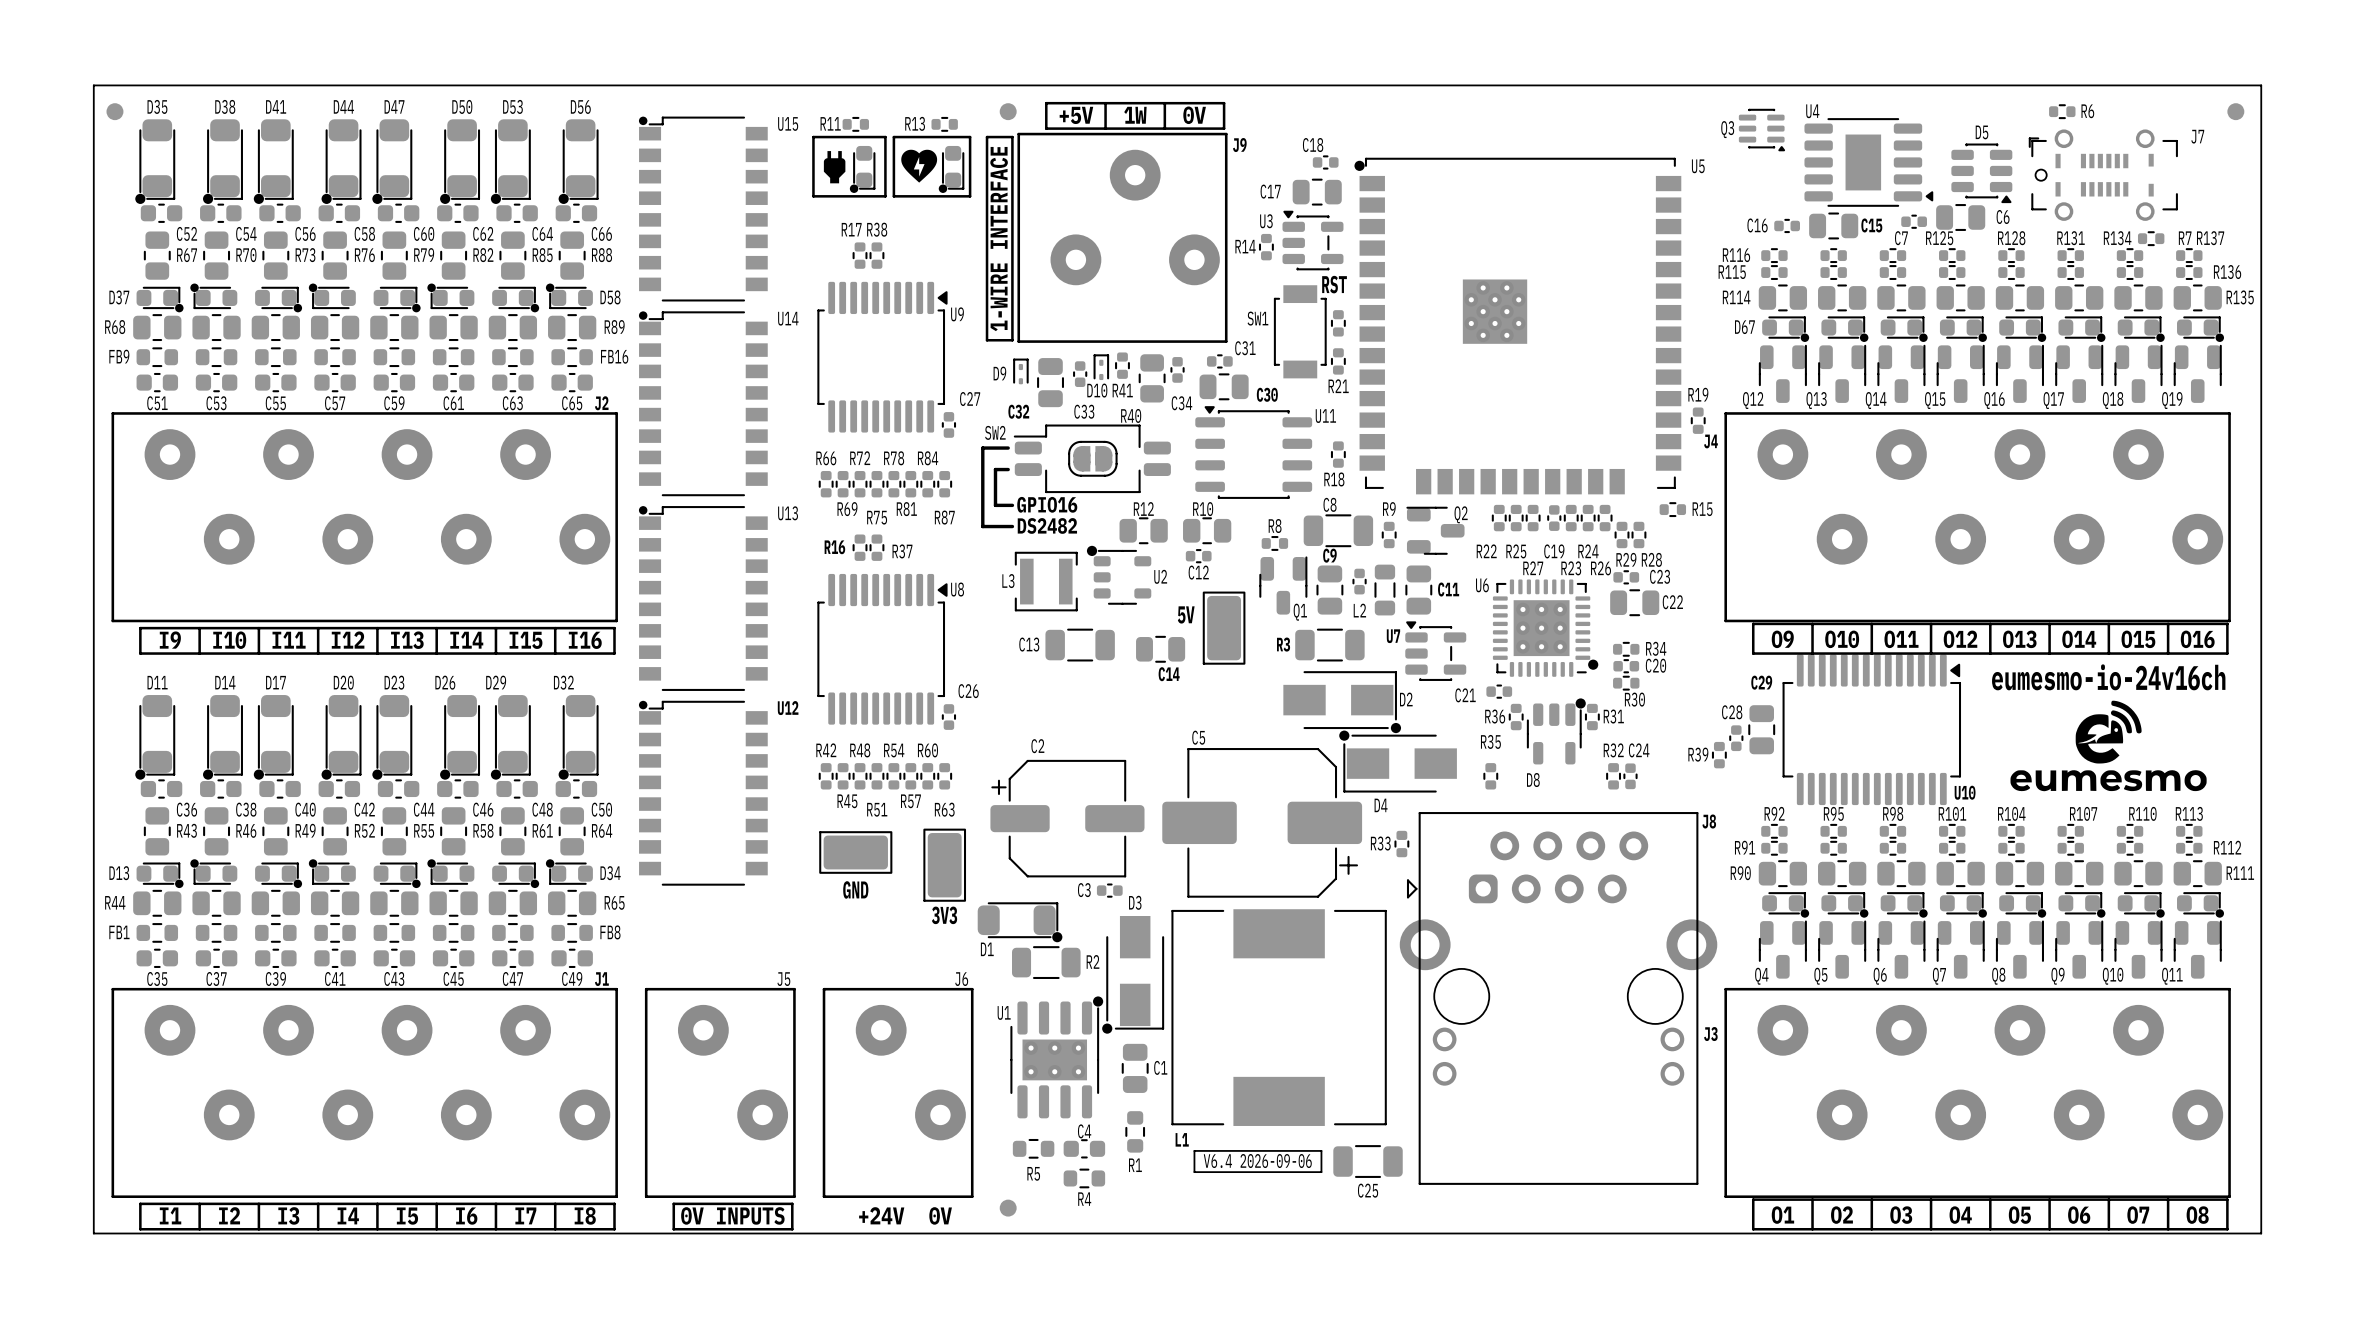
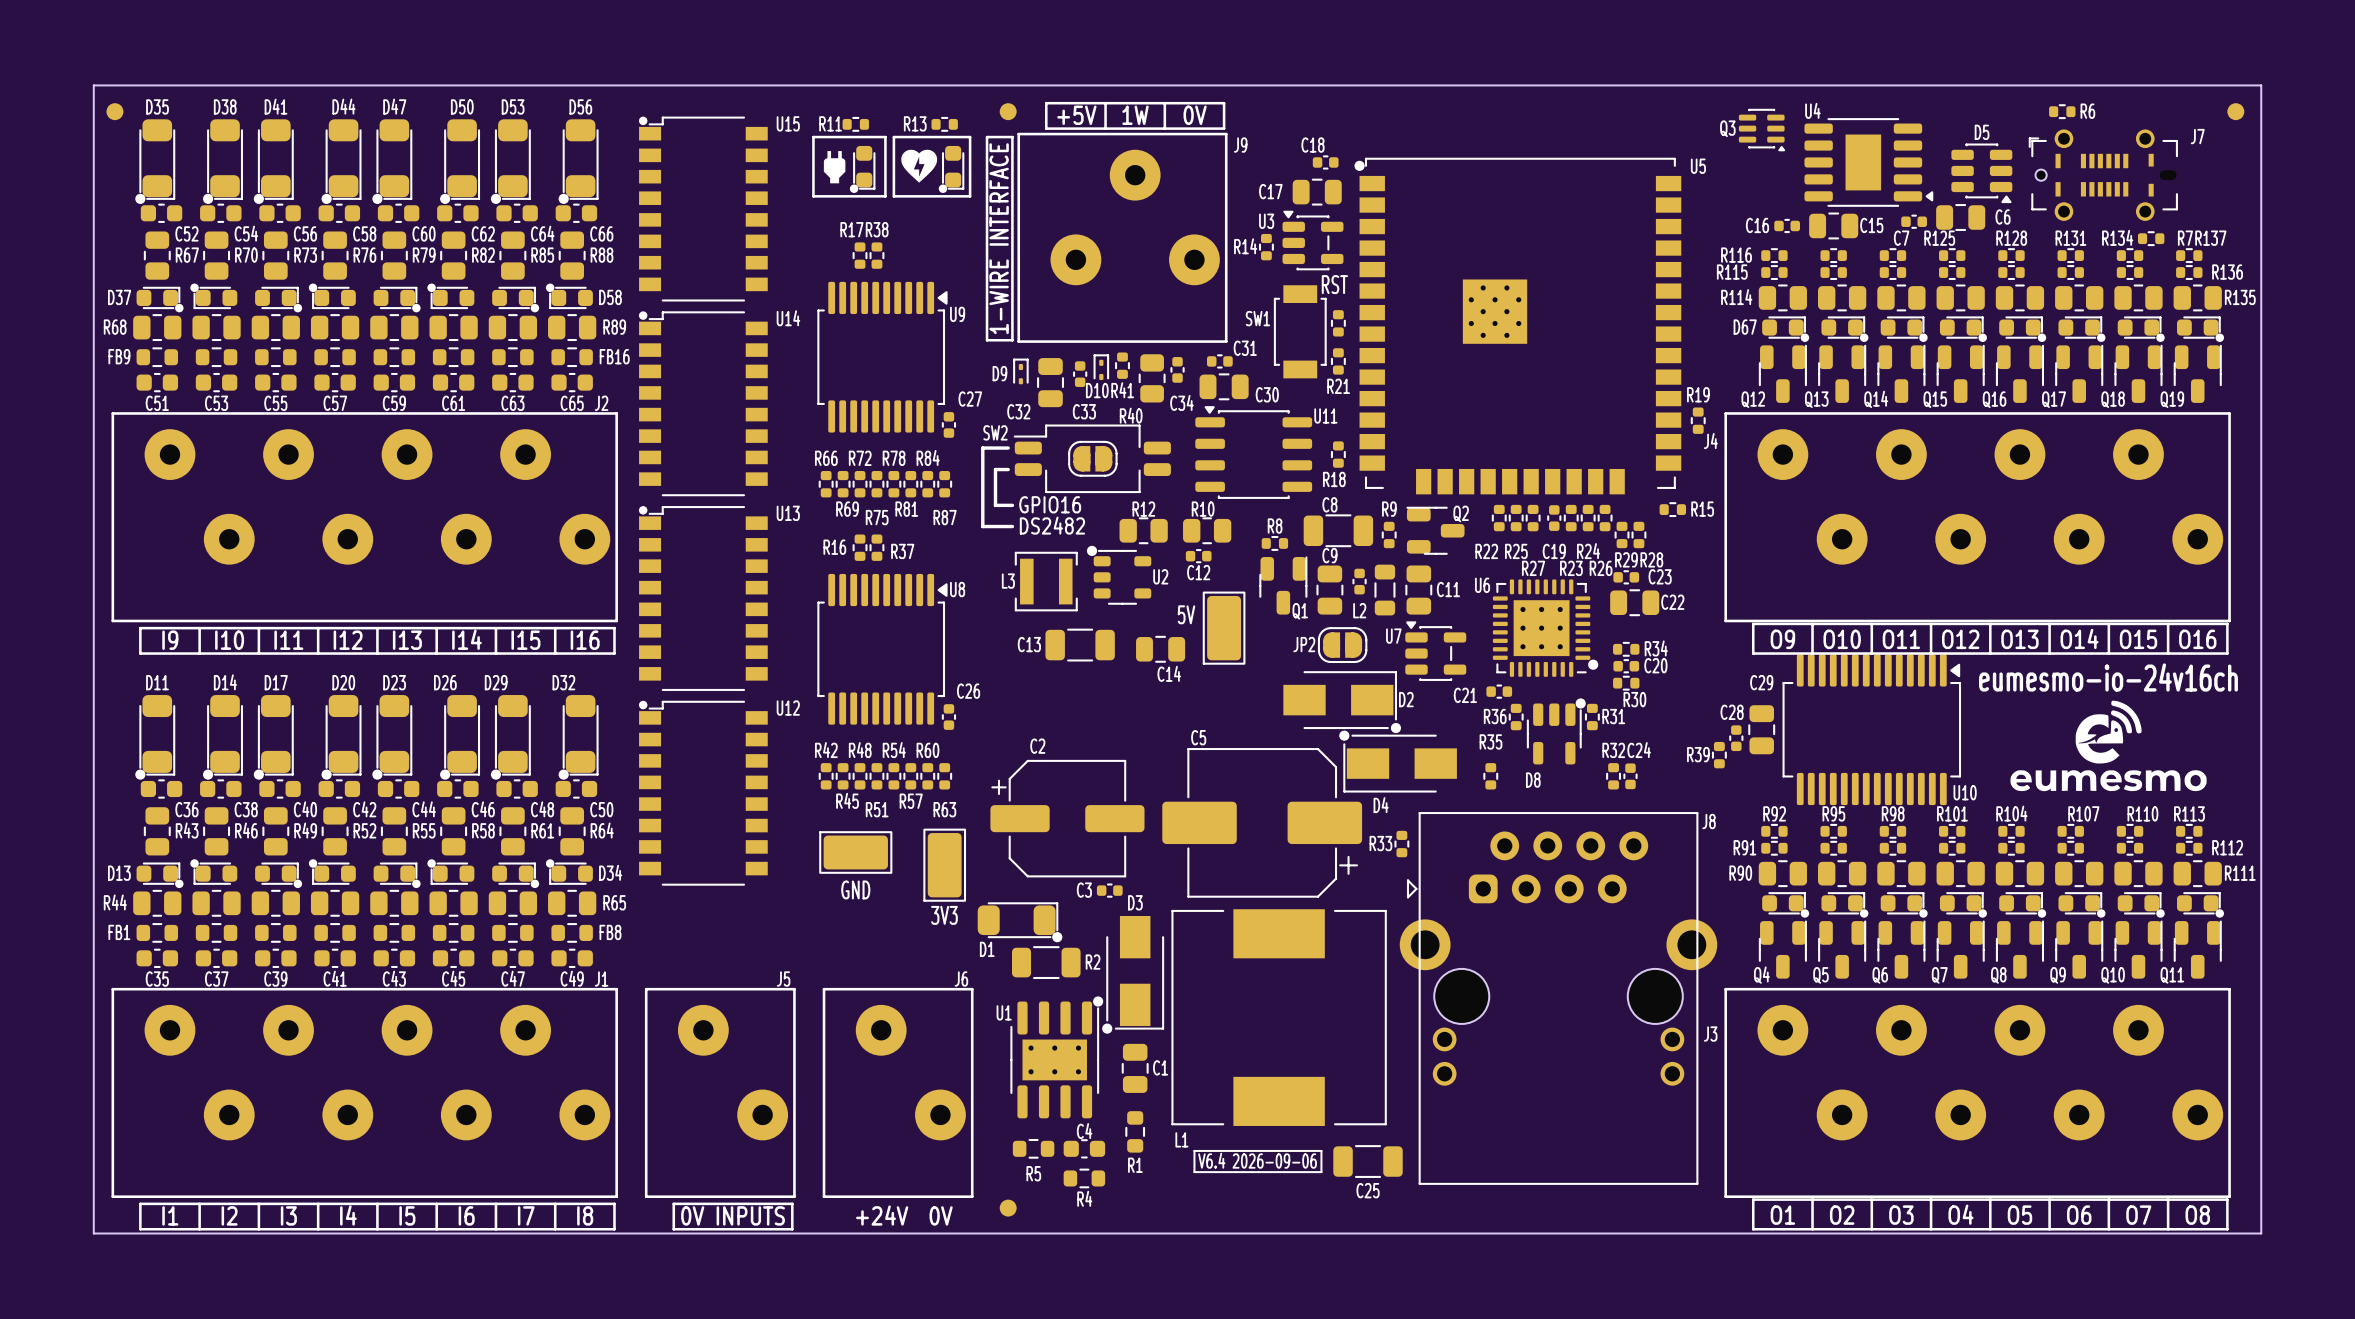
R3: (1329, 645) -> none
JP2: none -> (1342, 645)

